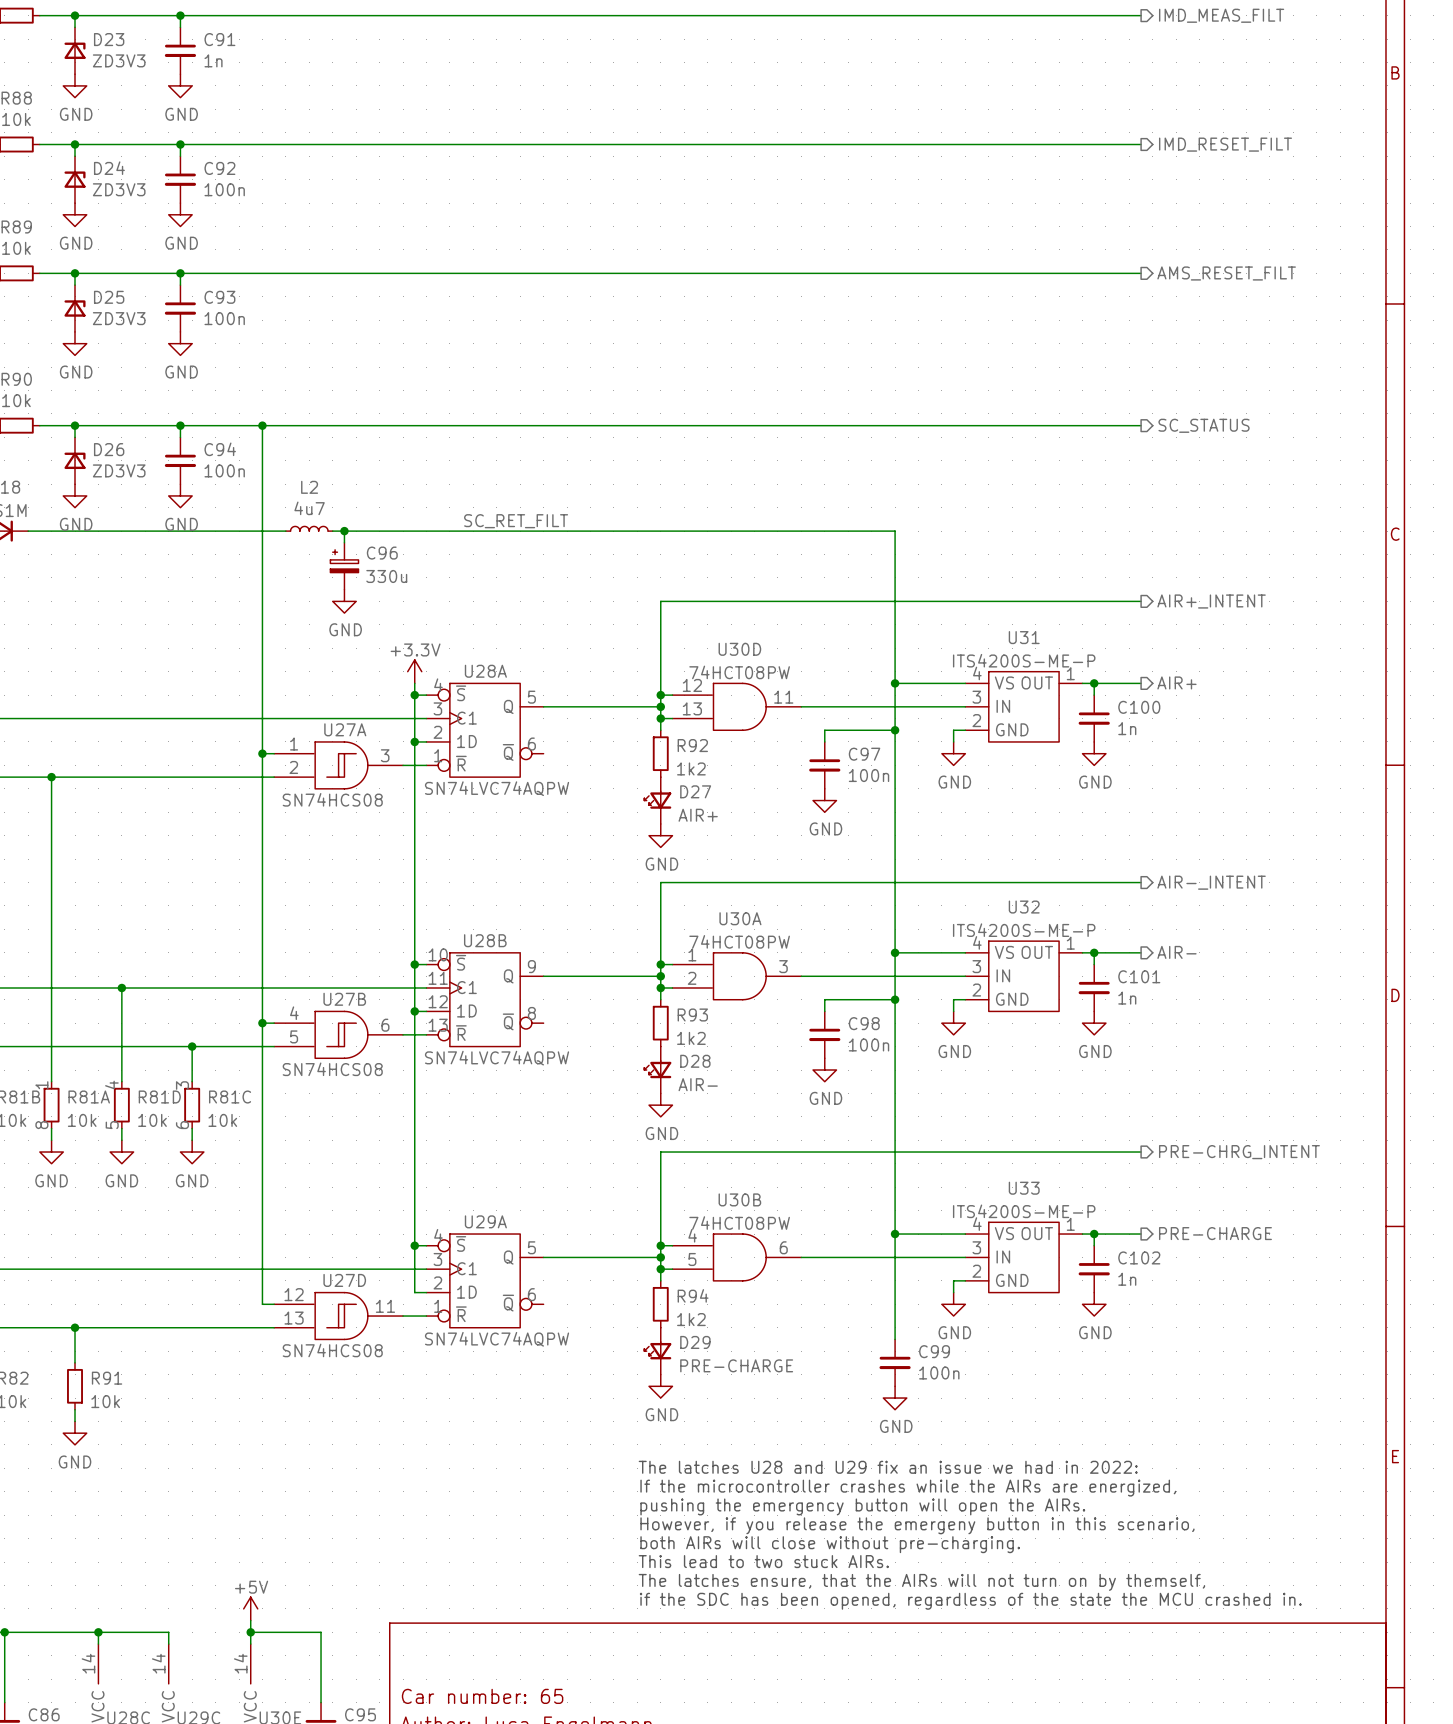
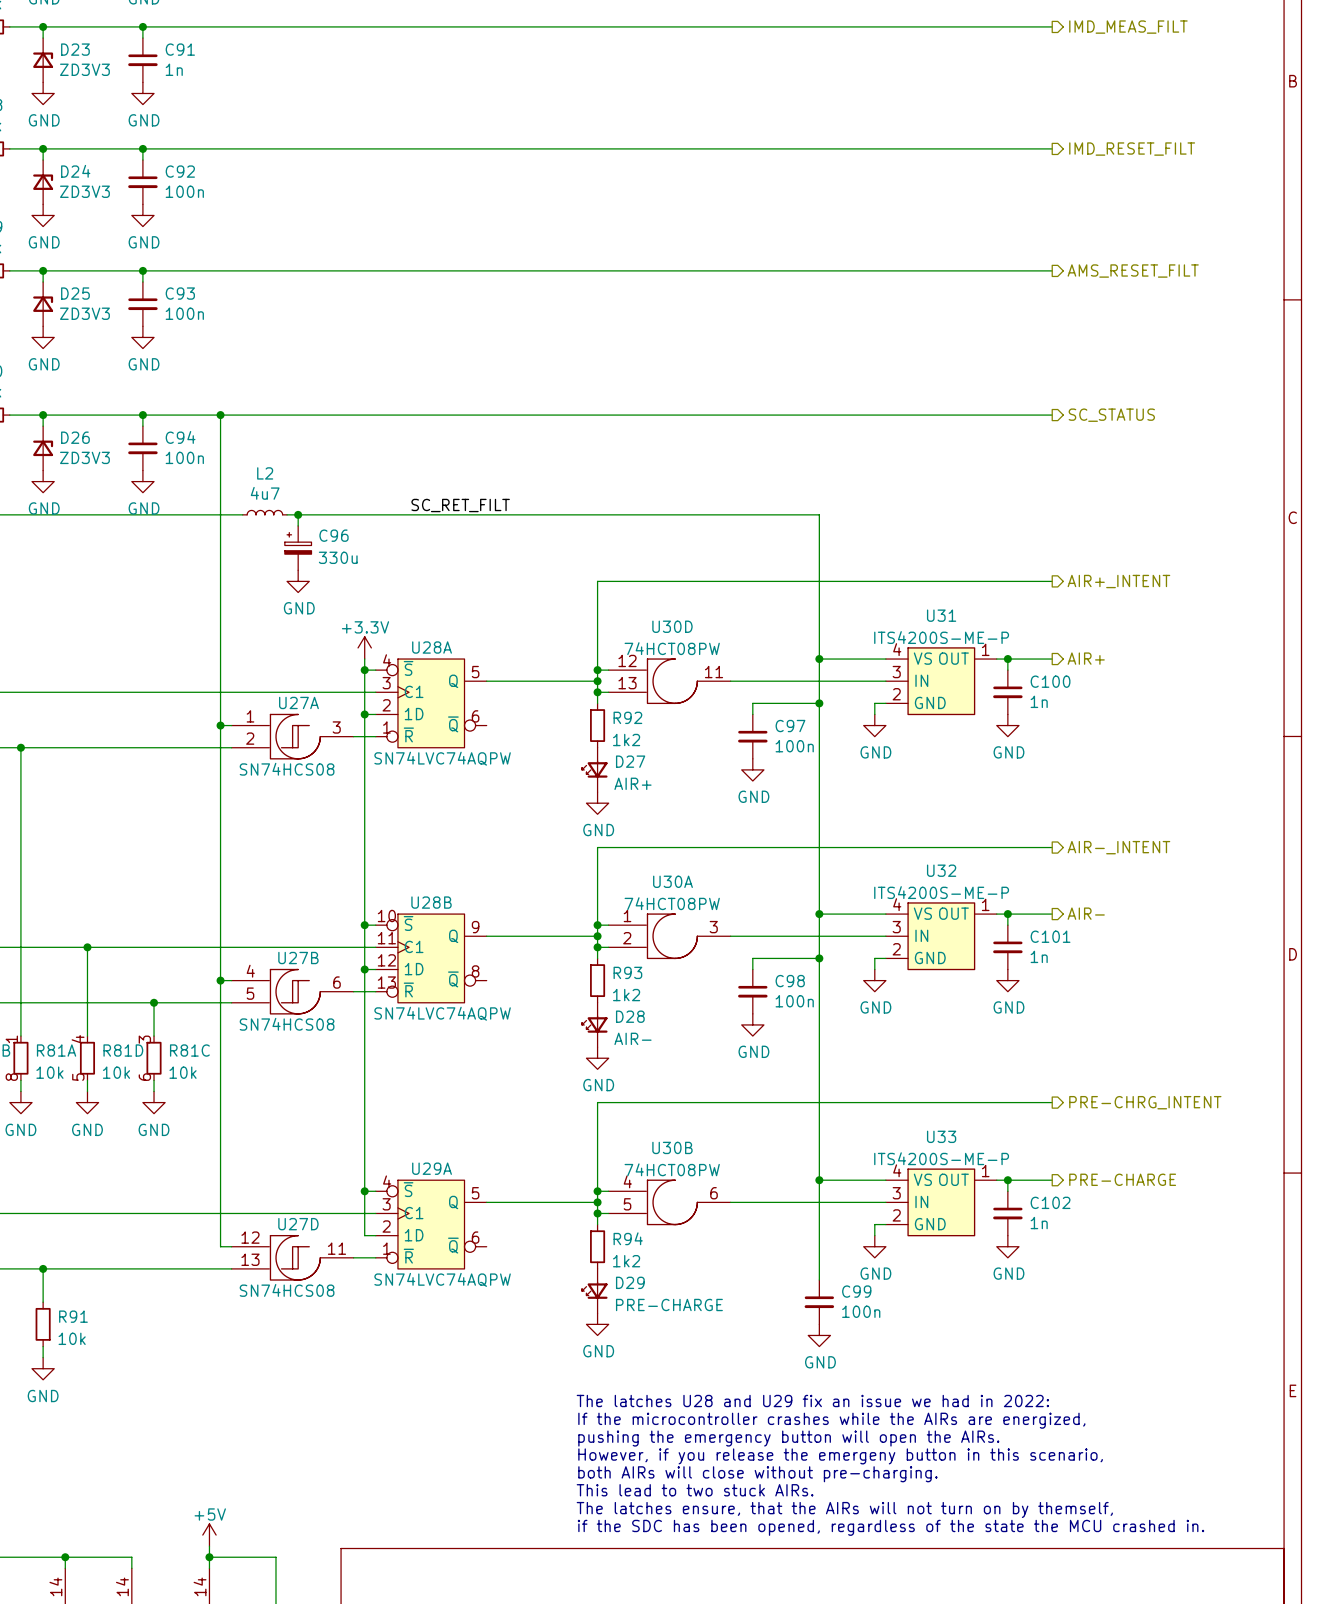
U30D symbol: [672, 682, 802, 731] -> [608, 658, 731, 705]
U27A symbol: [274, 741, 404, 790] -> [231, 713, 354, 760]
U30A symbol: [672, 952, 802, 1001] -> [608, 913, 731, 960]
U27B symbol: [274, 1010, 404, 1059] -> [231, 968, 354, 1015]
U30B symbol: [672, 1233, 802, 1282] -> [608, 1179, 731, 1226]
U27D symbol: [274, 1291, 404, 1341] -> [231, 1234, 354, 1281]

